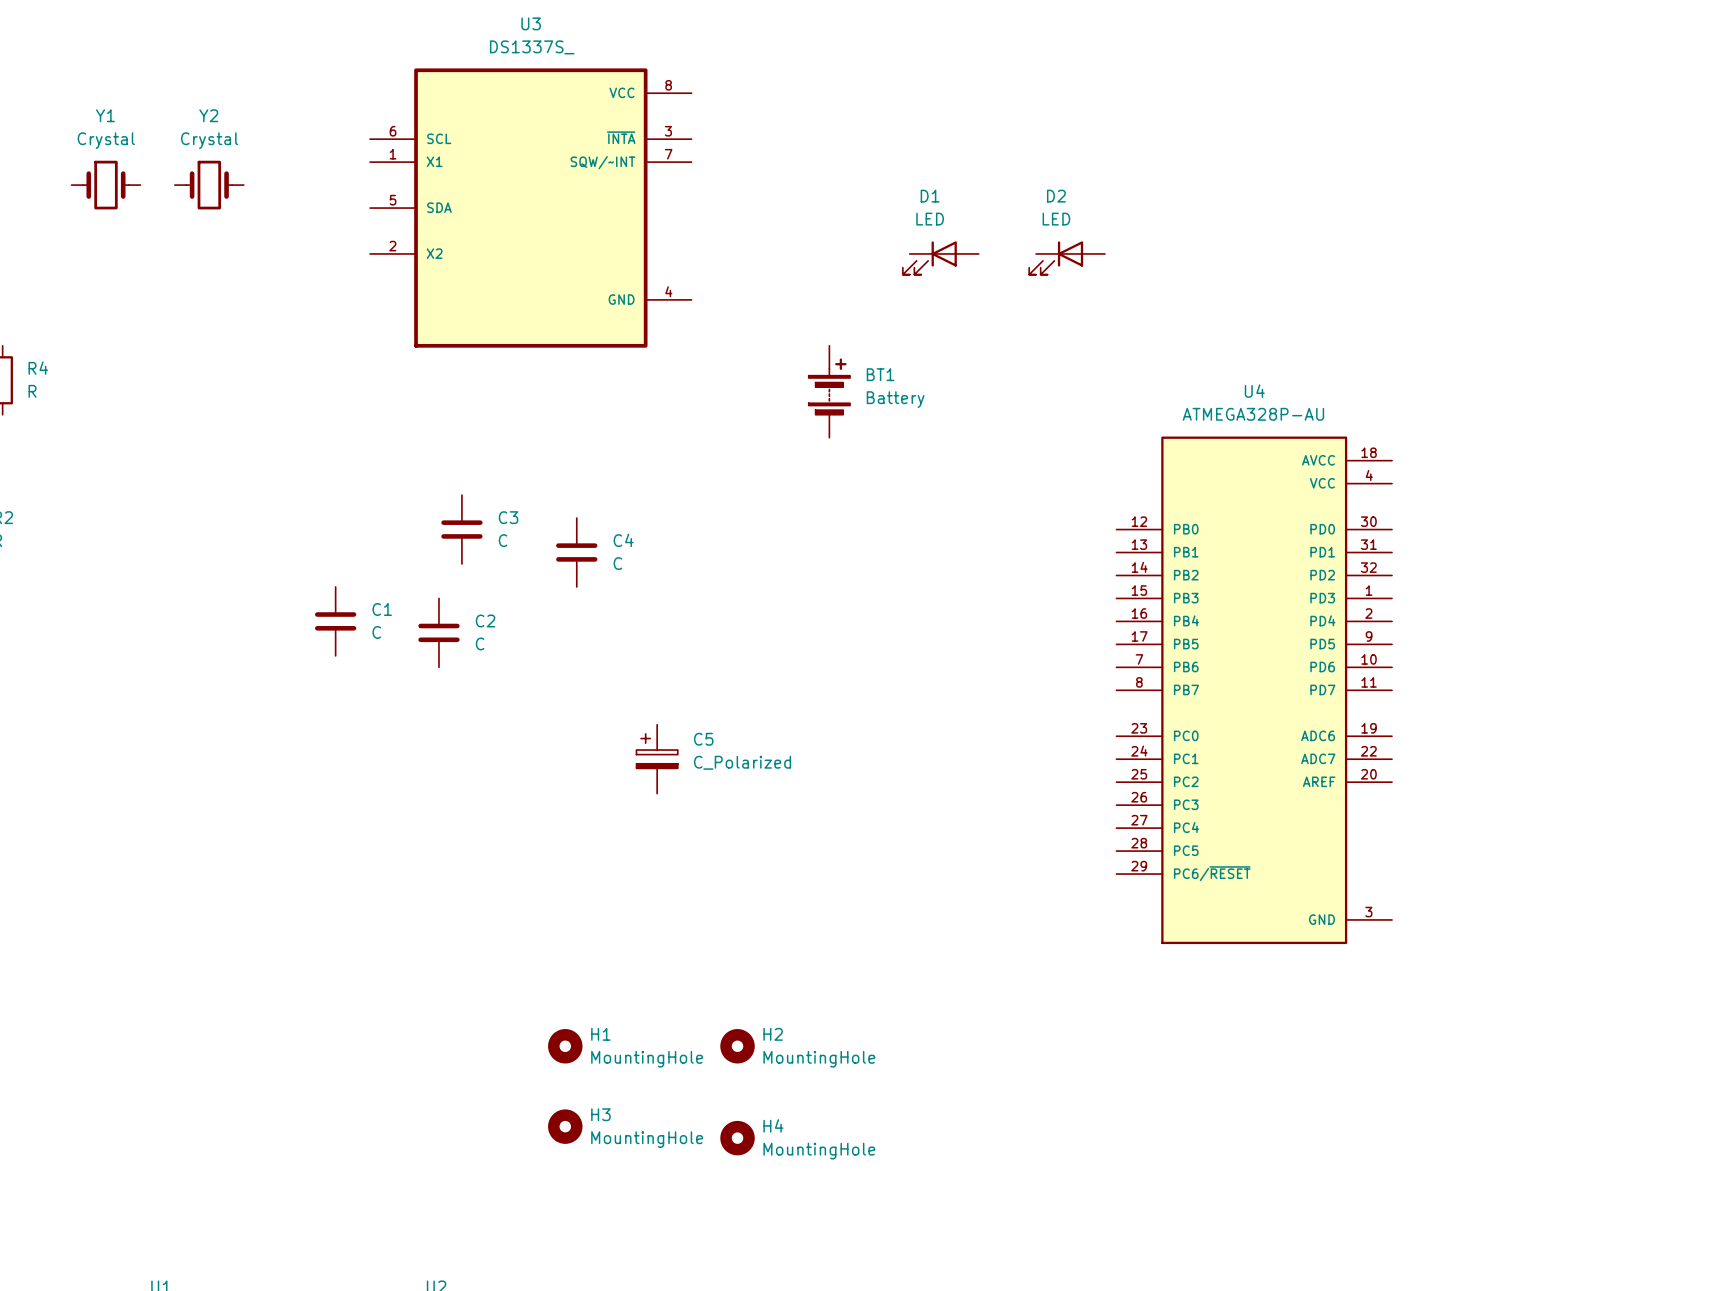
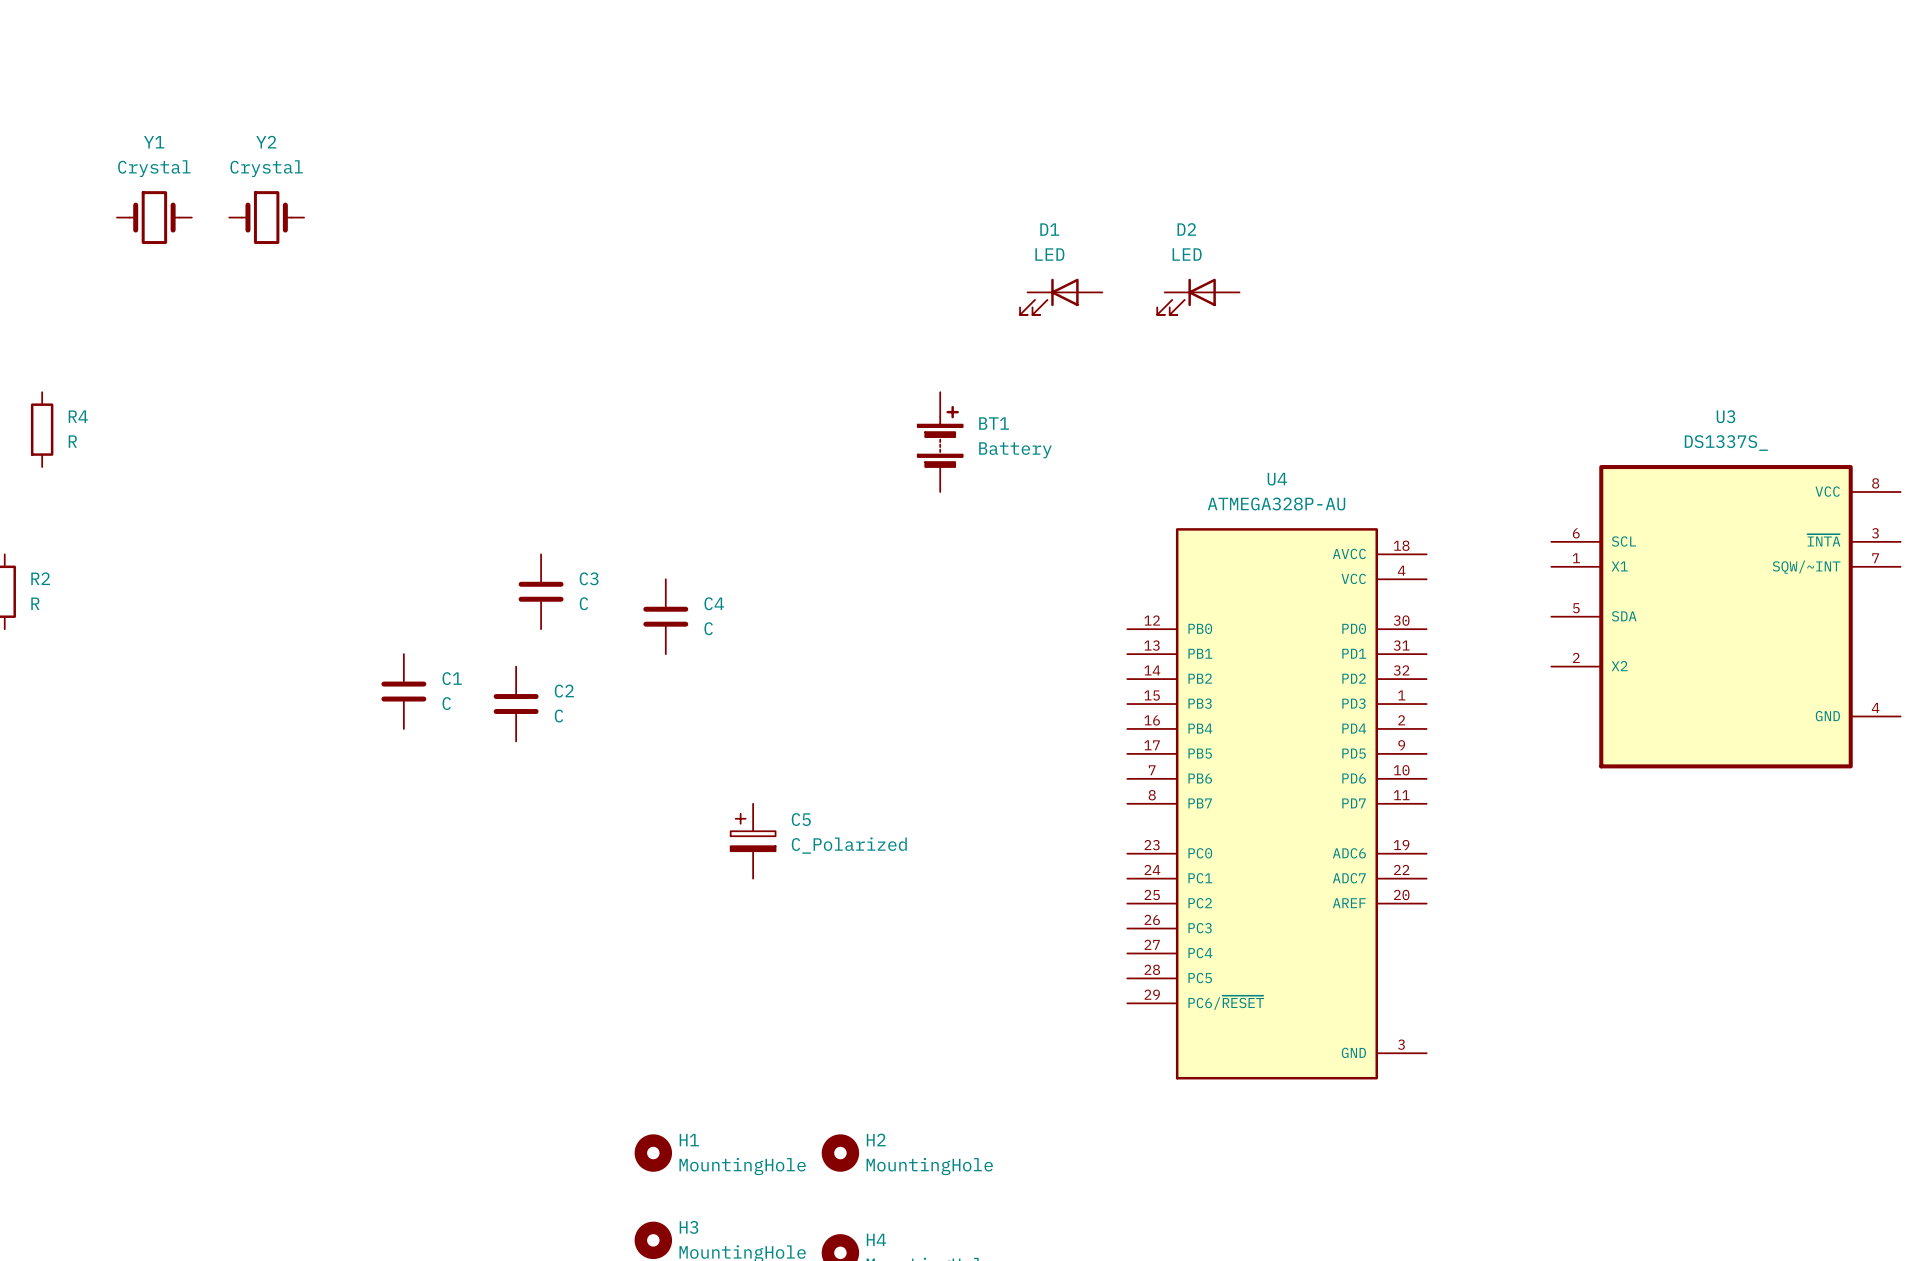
U3 position: (530, 208) -> (1725, 616)
U4 position: (1254, 690) -> (1276, 803)

